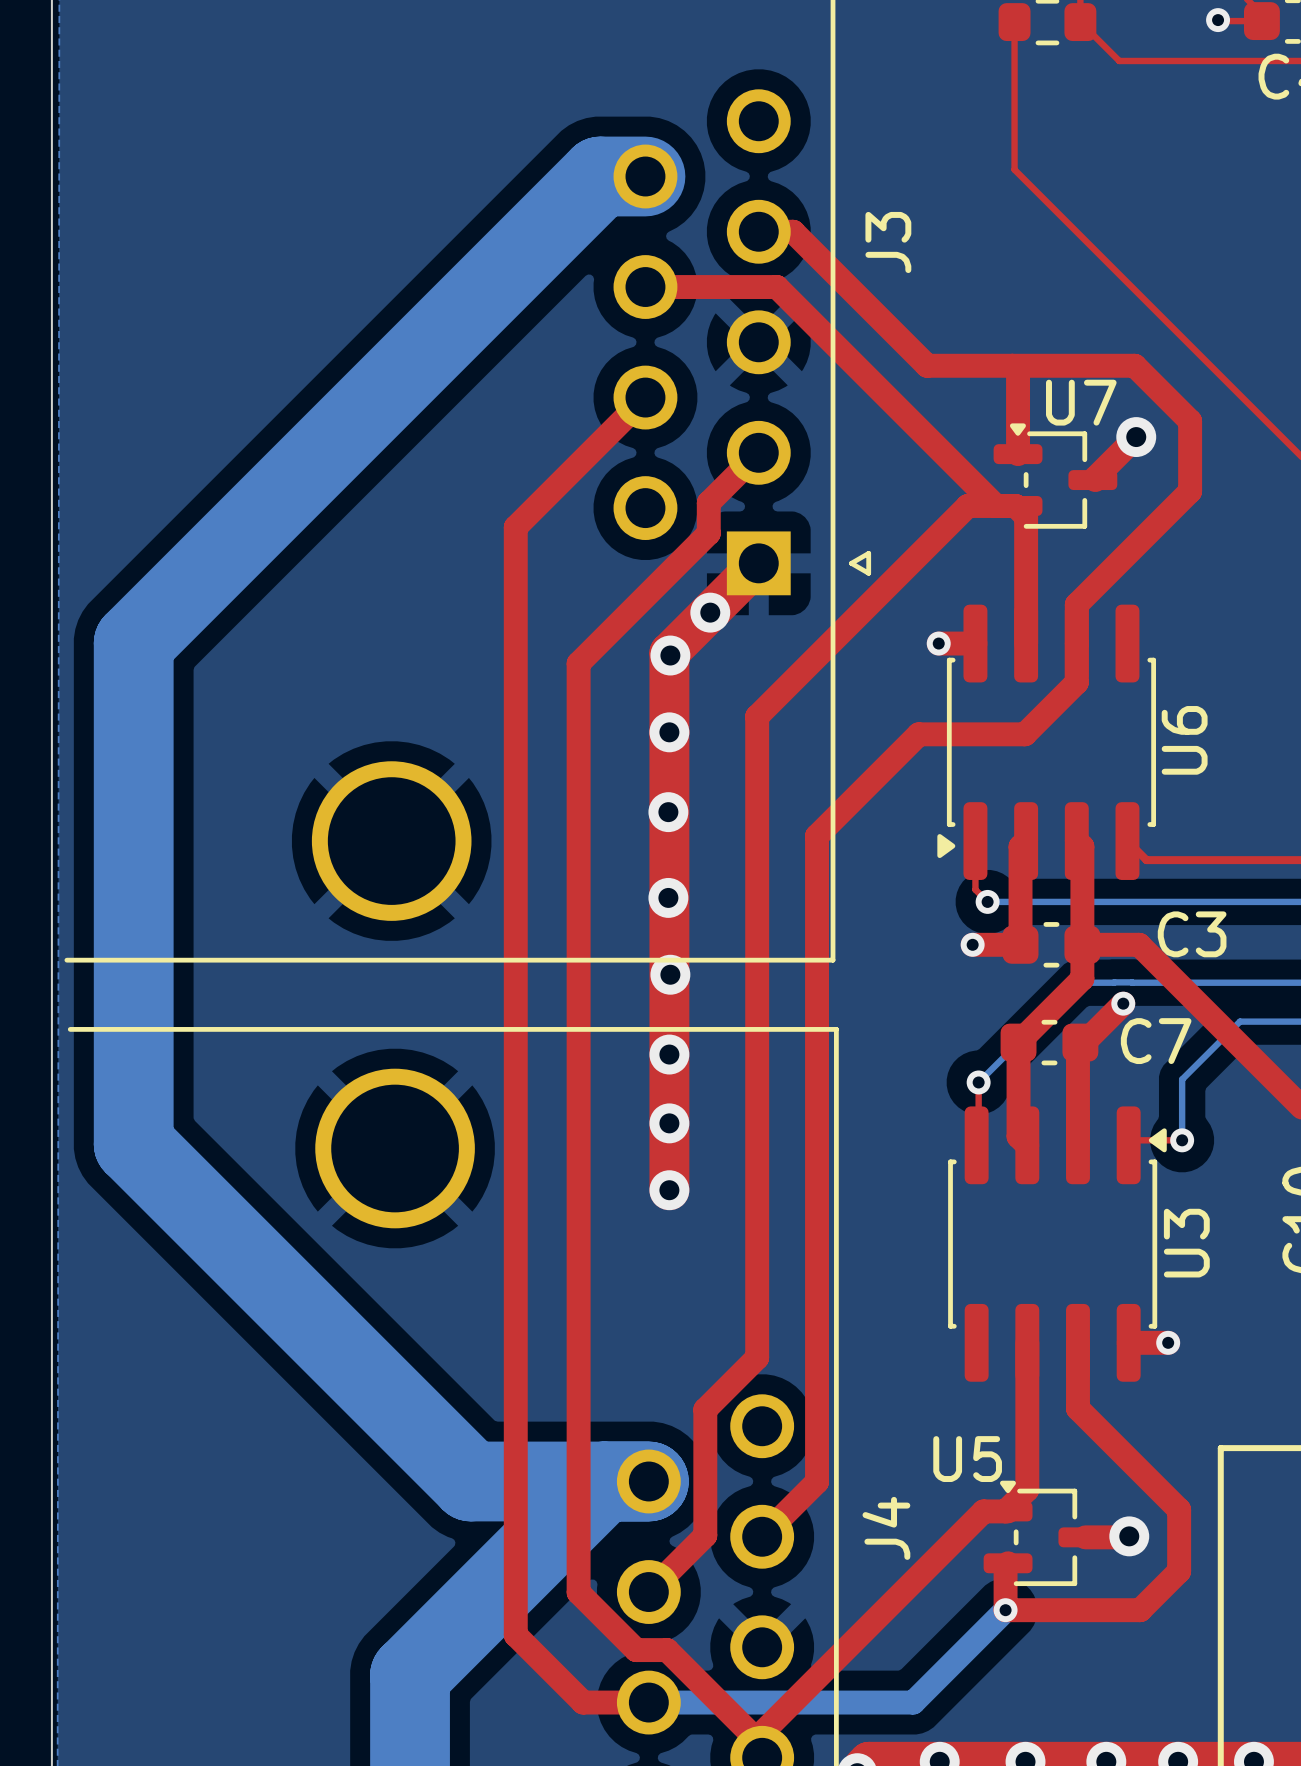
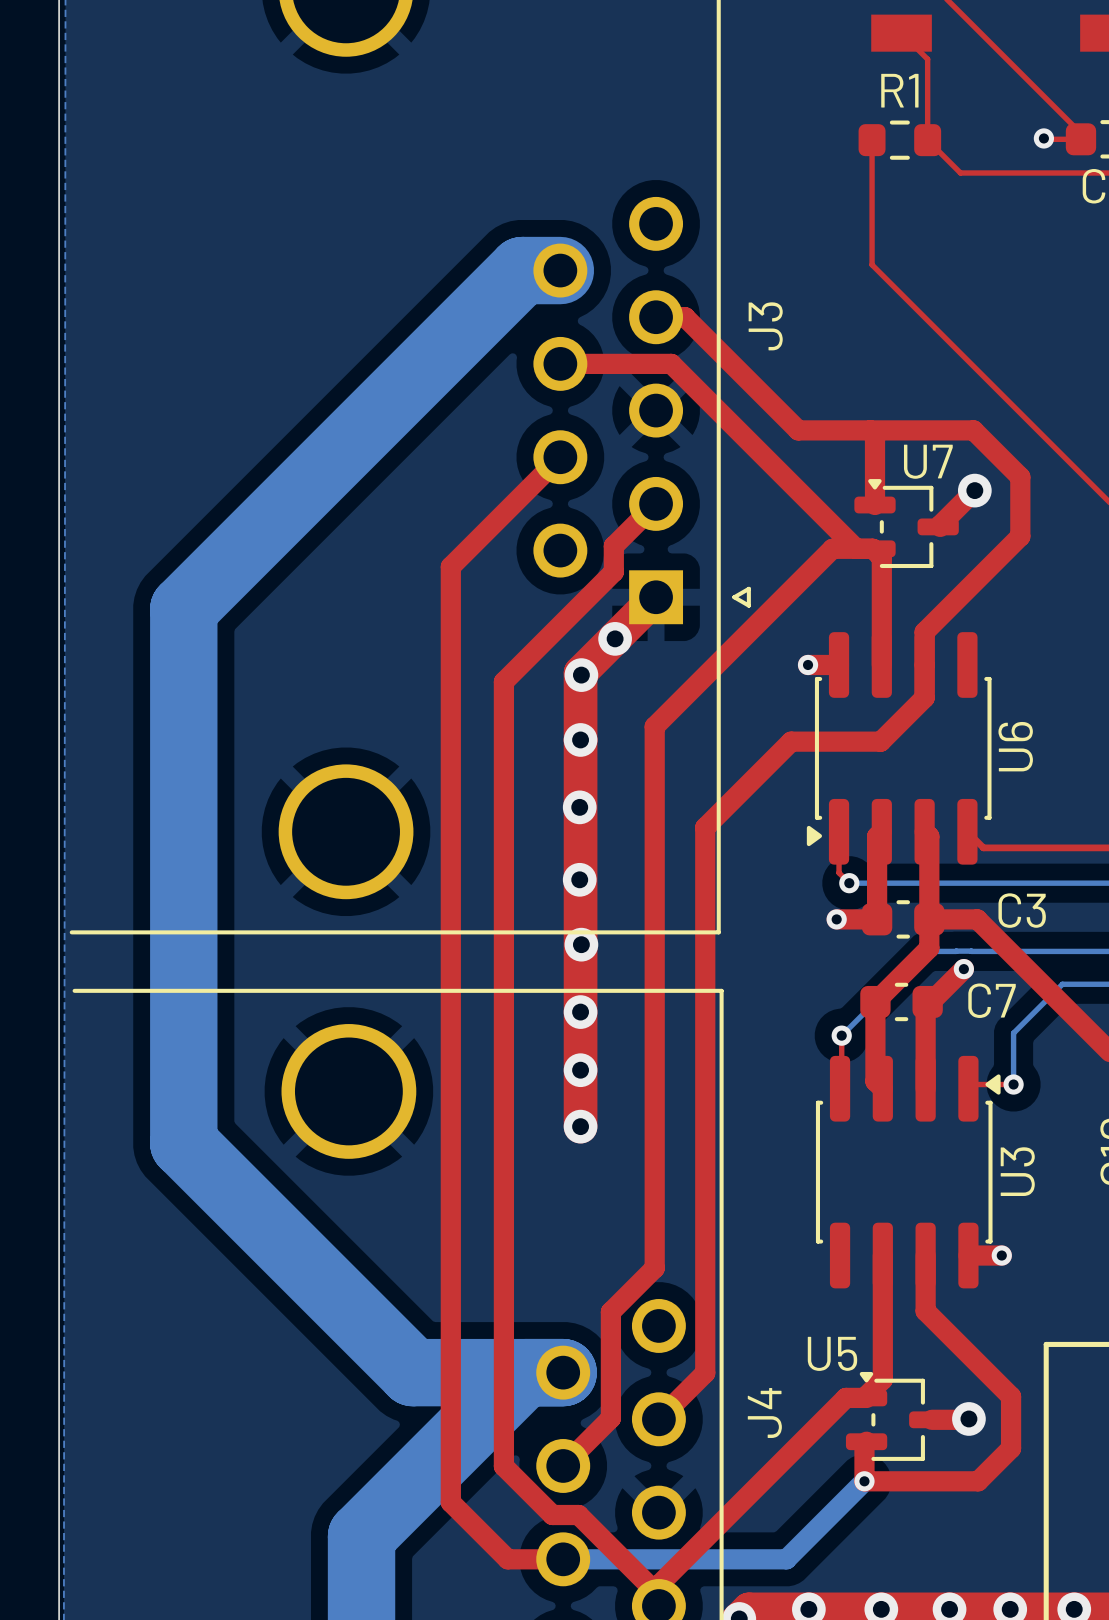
bottom track: (199, 577) (133, 643) (133, 1144) (199, 1210) -> (183, 609) (183, 1143)

